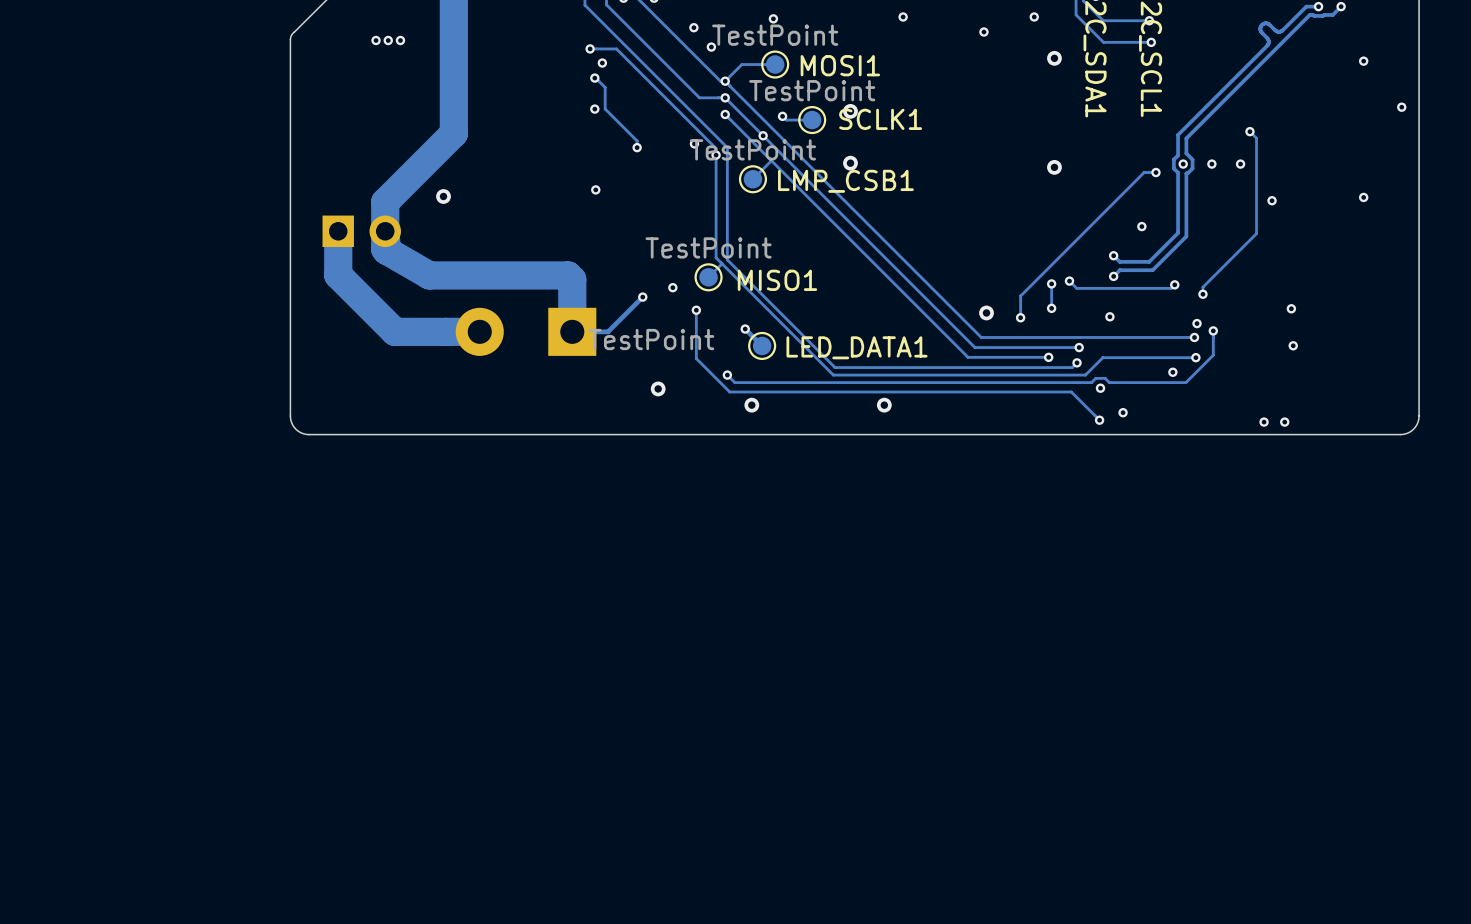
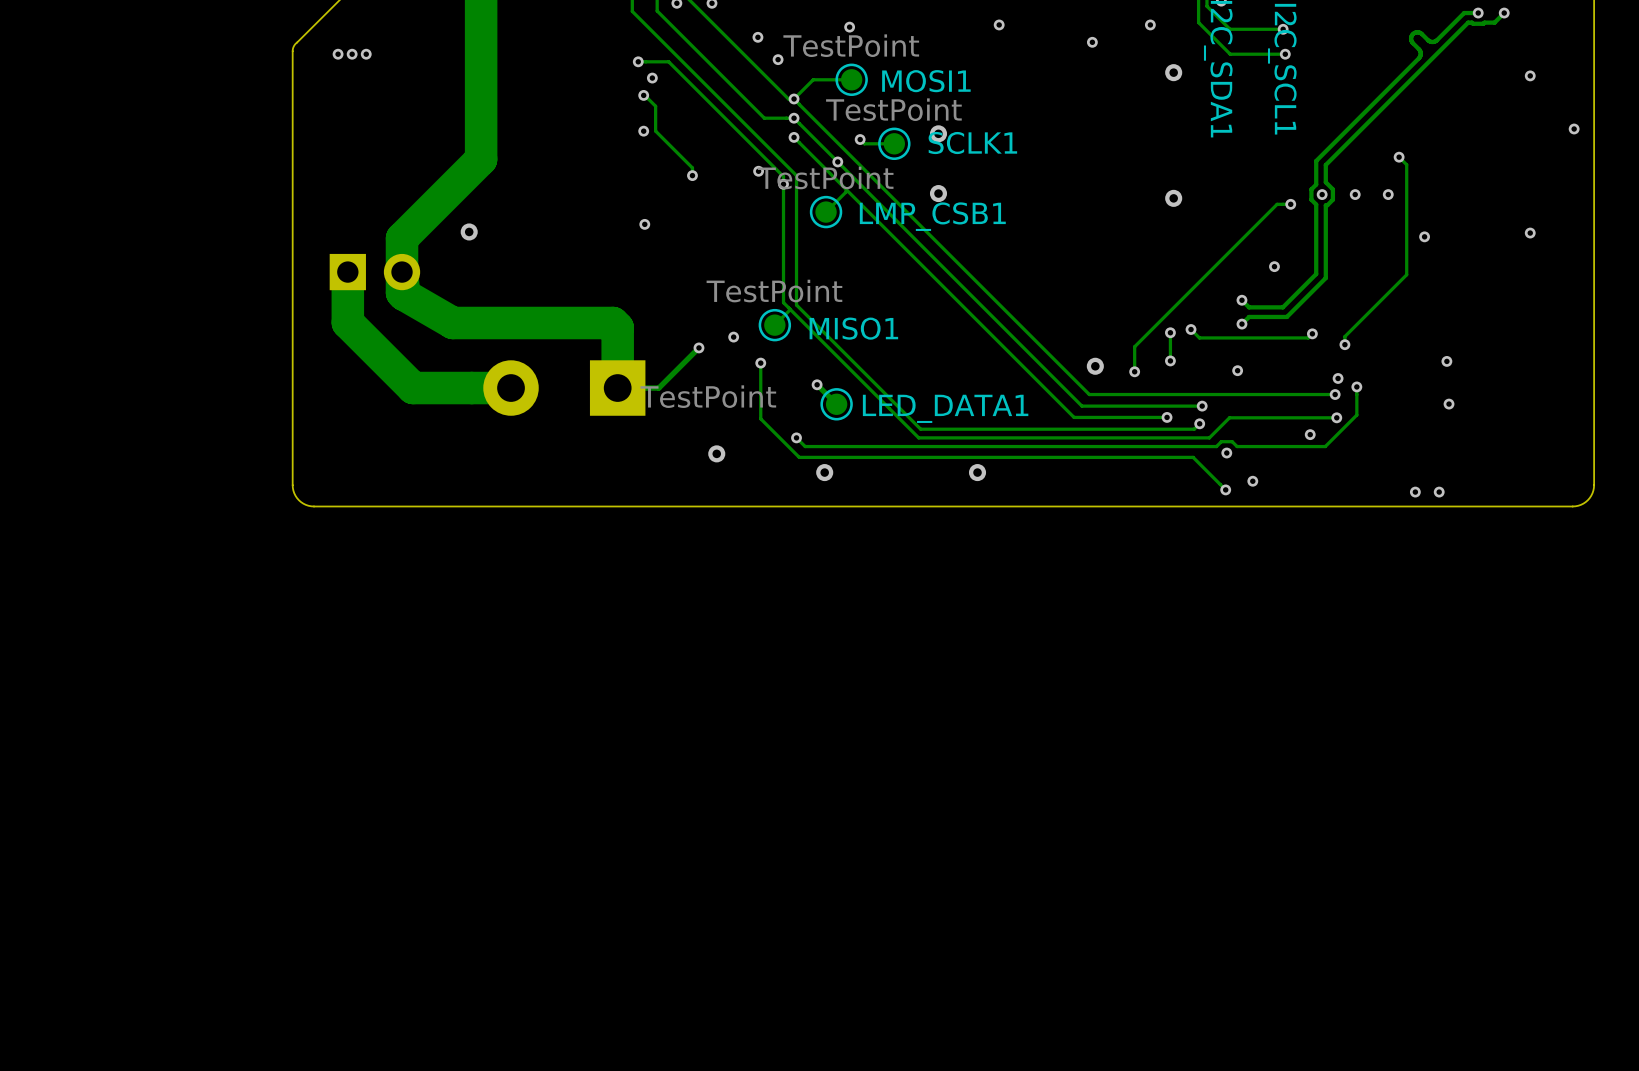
via: (376, 40) -> none
via: (388, 40) -> none
via: (400, 40) -> none
via: none -> (338, 54)
via: none -> (352, 54)
via: none -> (366, 54)

